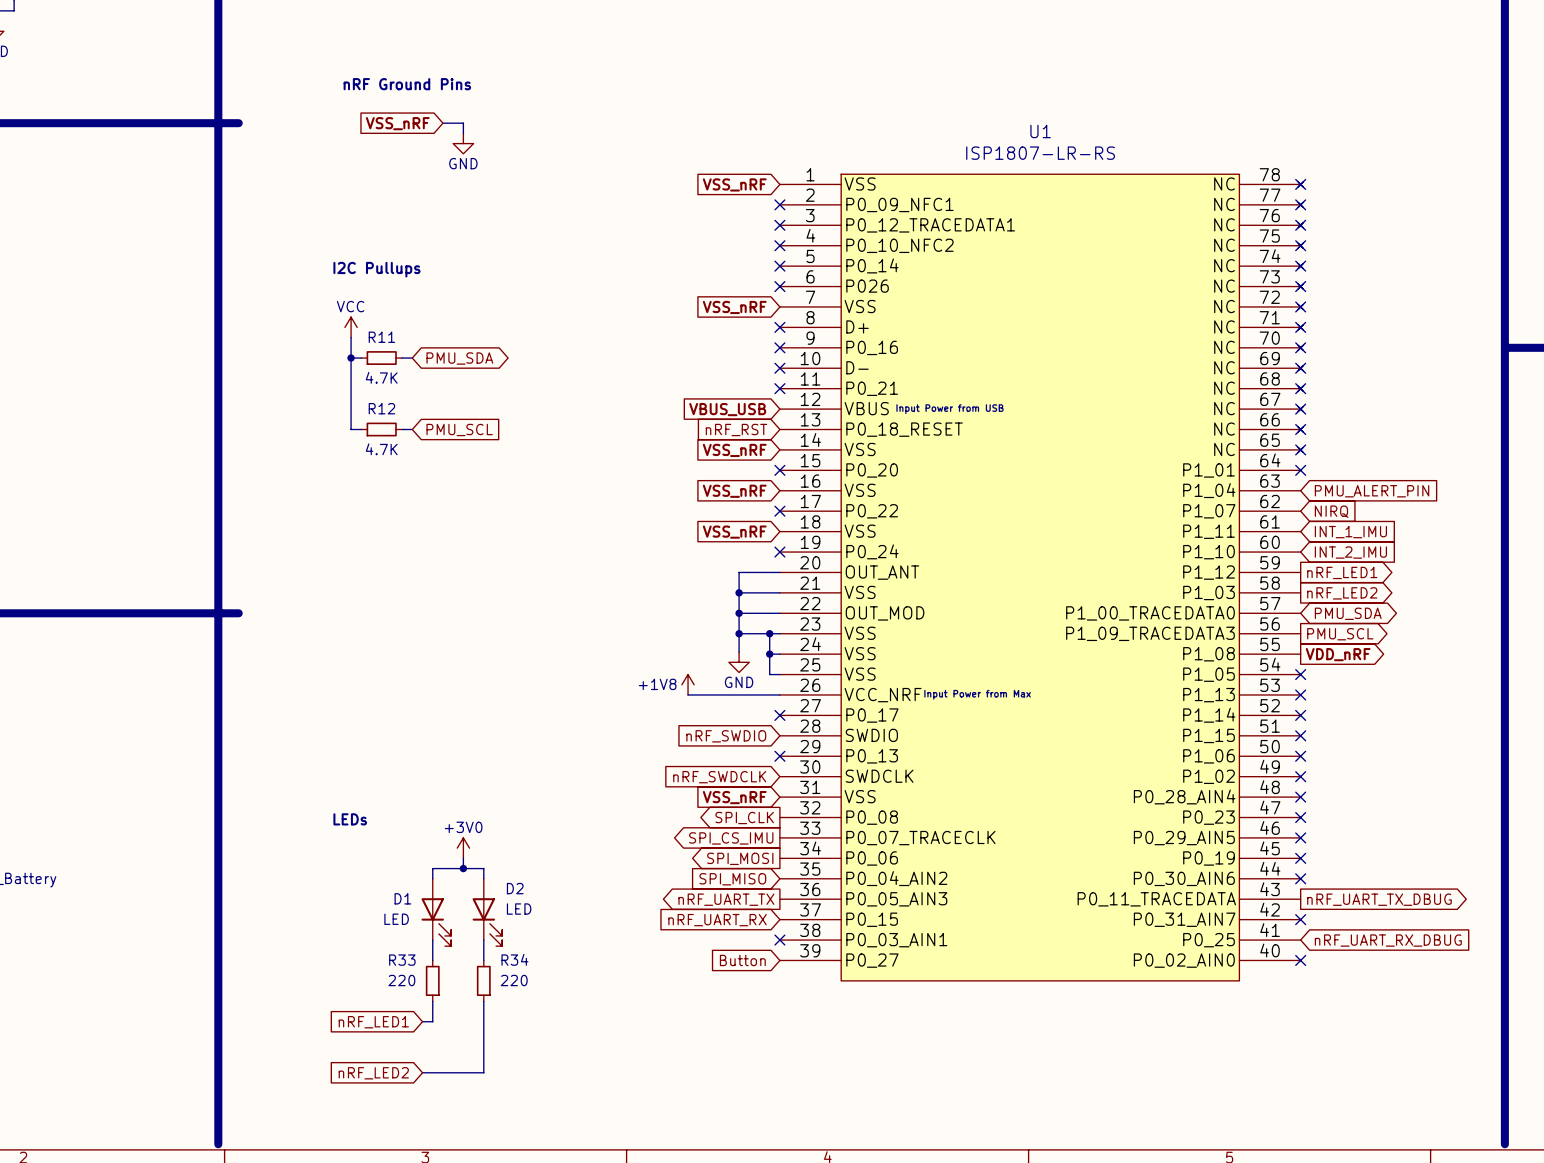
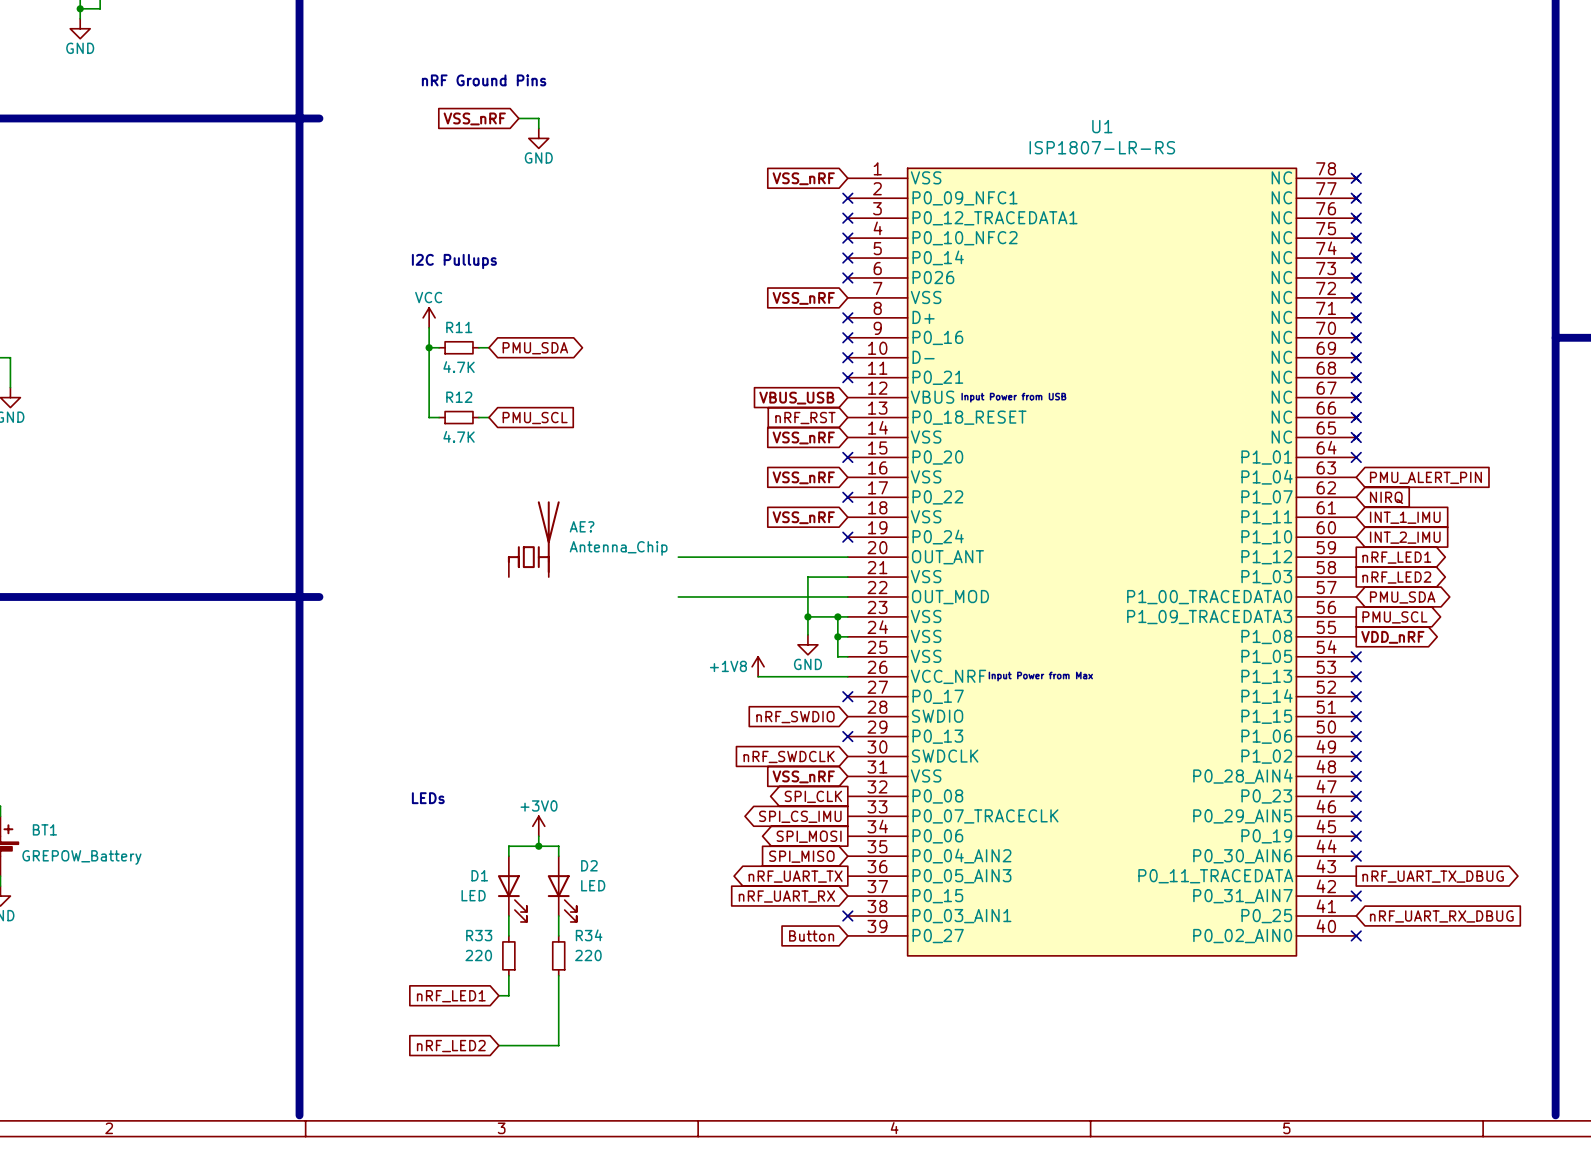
AE?: none -> Antenna_Chip (533, 539)
wire: (739, 572) (739, 592) -> (807, 557) (678, 557)
junction: (739, 592) -> none
wire: none -> (678, 596) (807, 596)
junction: (739, 613) -> none

